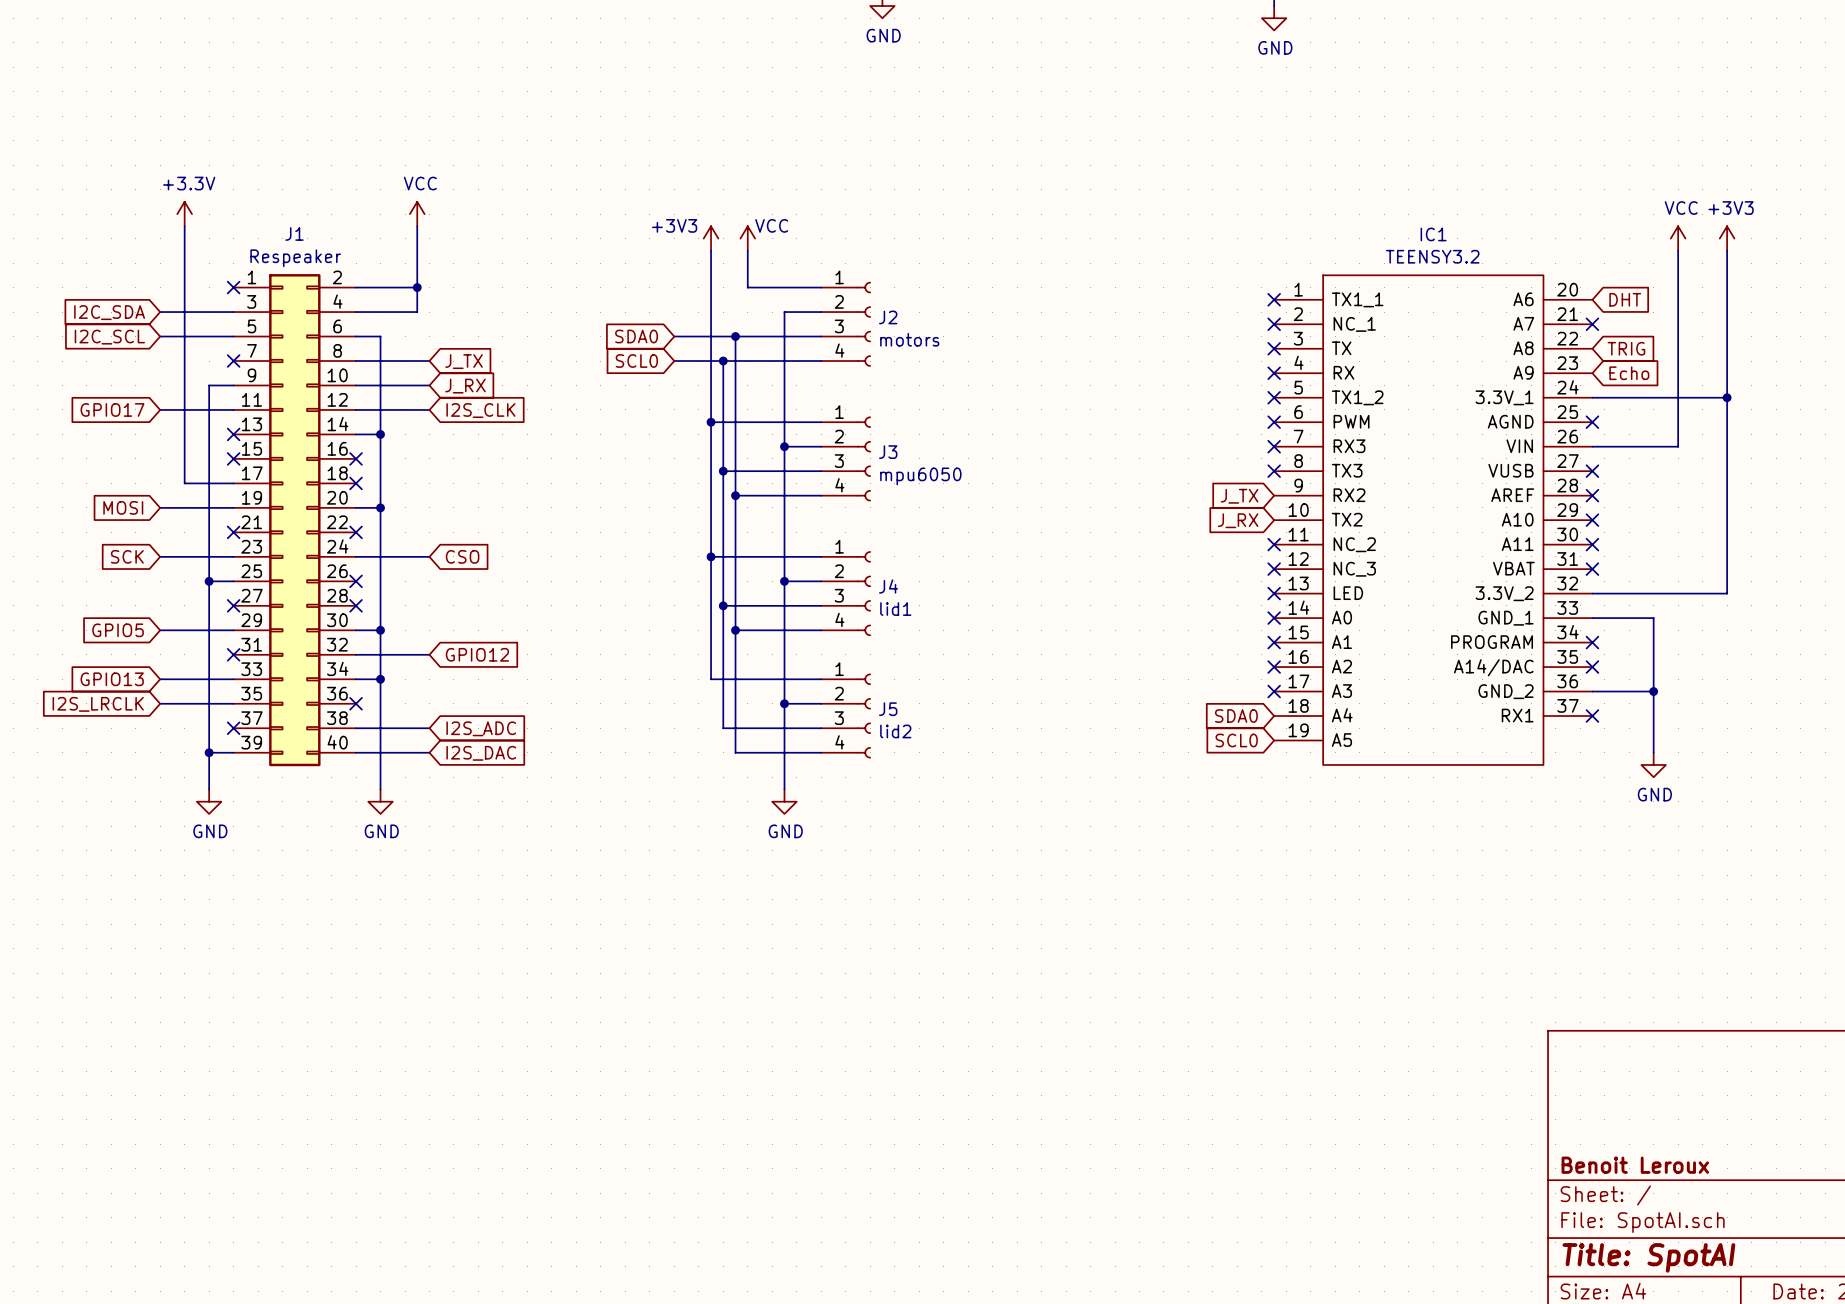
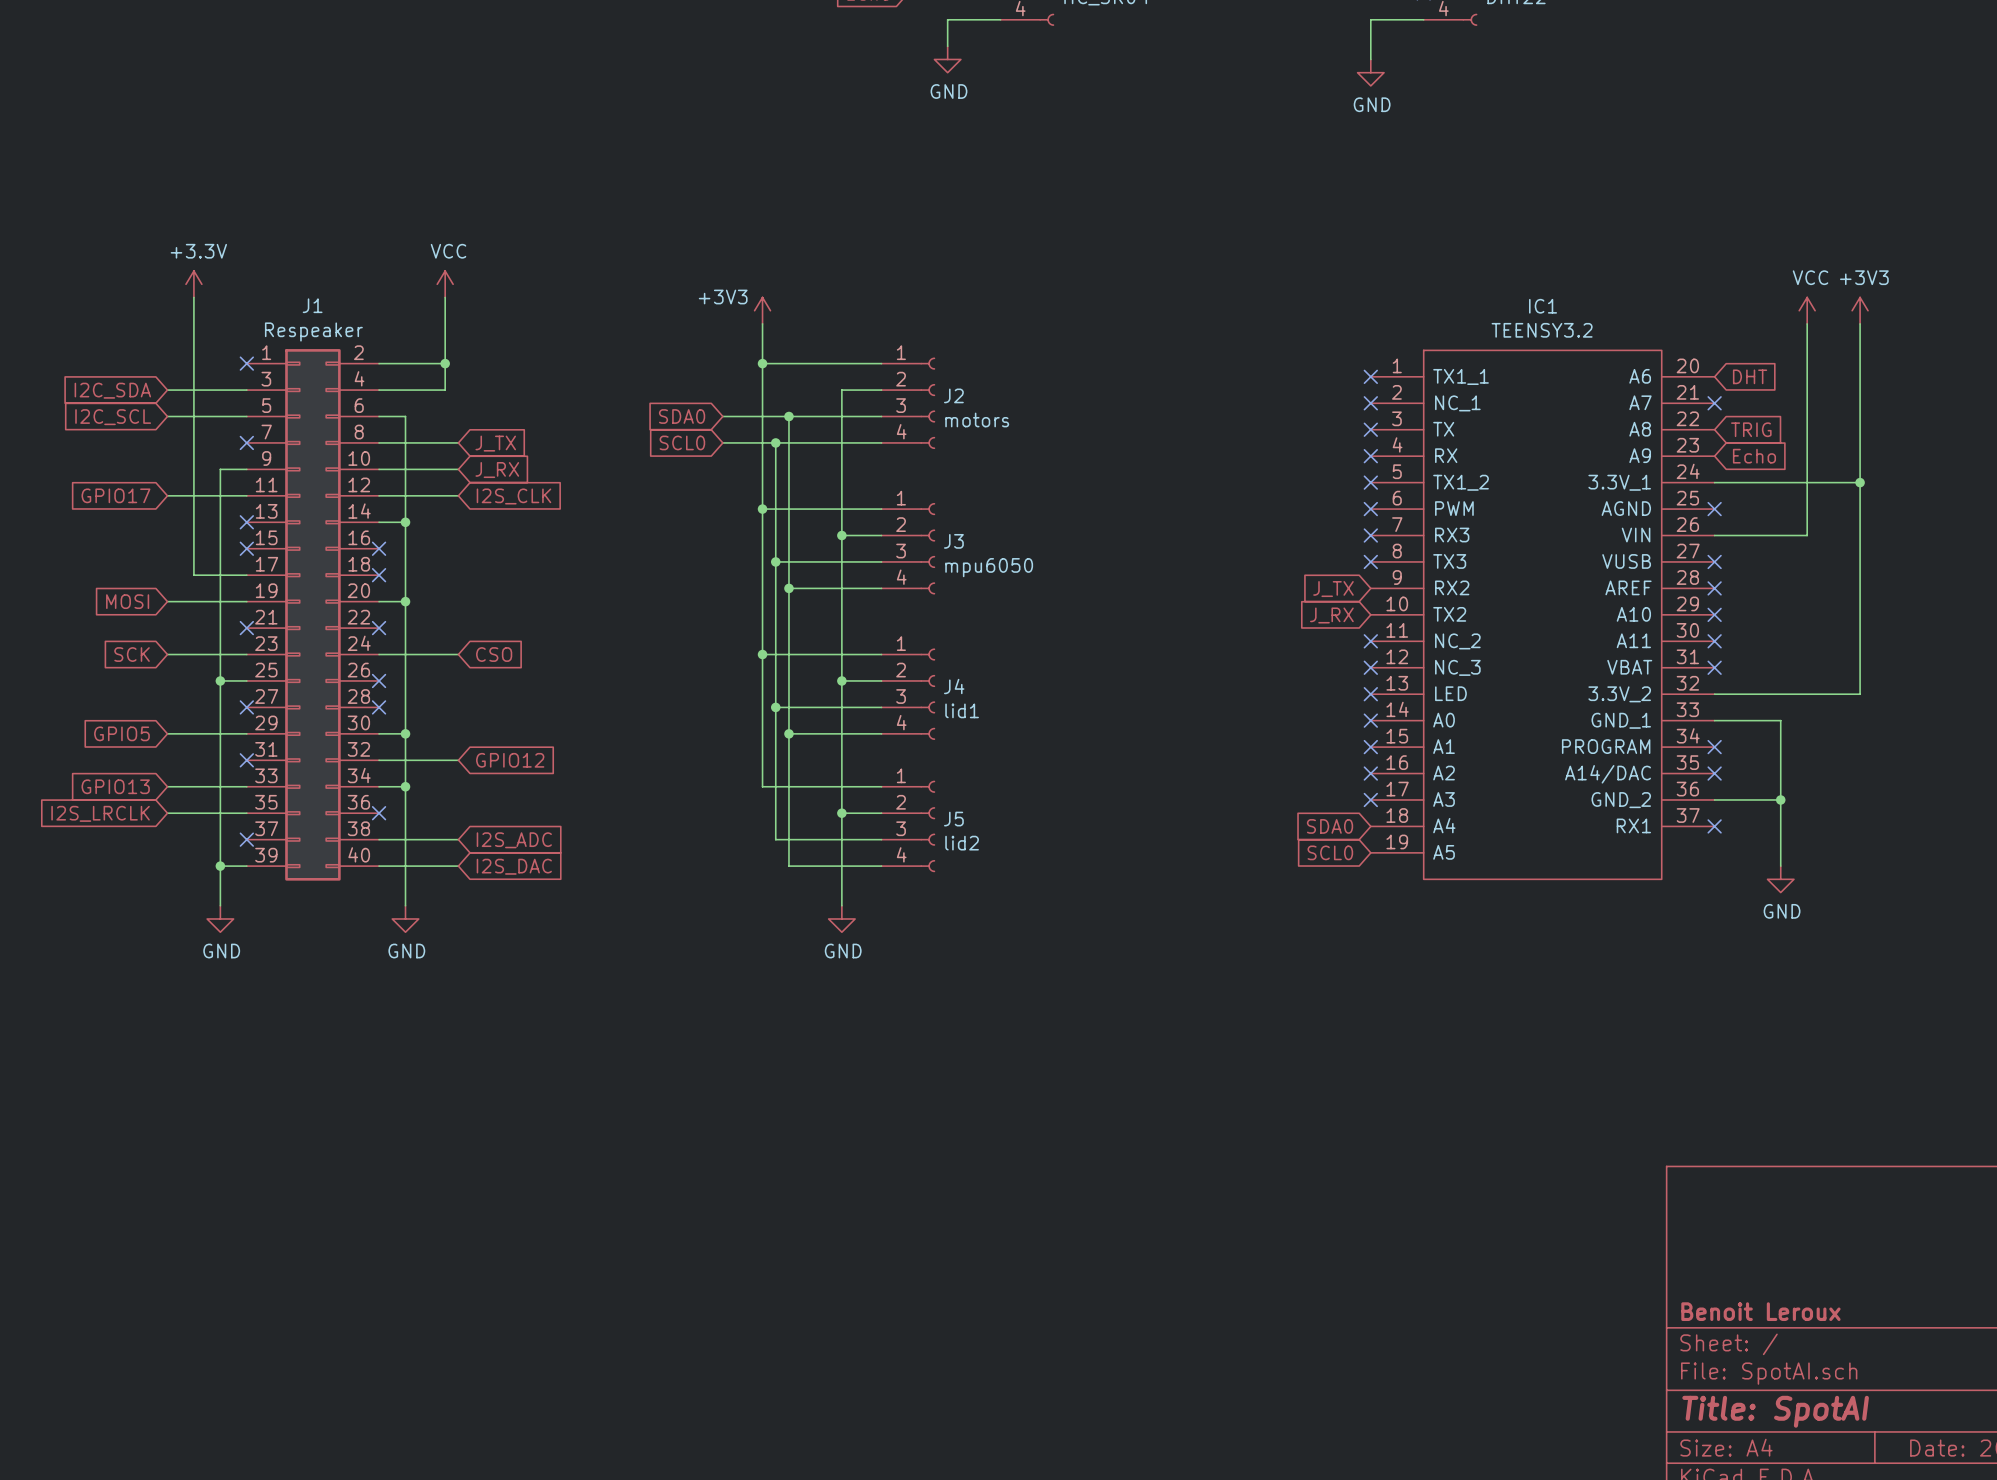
power symbol: VCC (747, 238) -> none
wire: (747, 250) (747, 287) -> (762, 363) (802, 363)
junction: none -> (762, 363)

